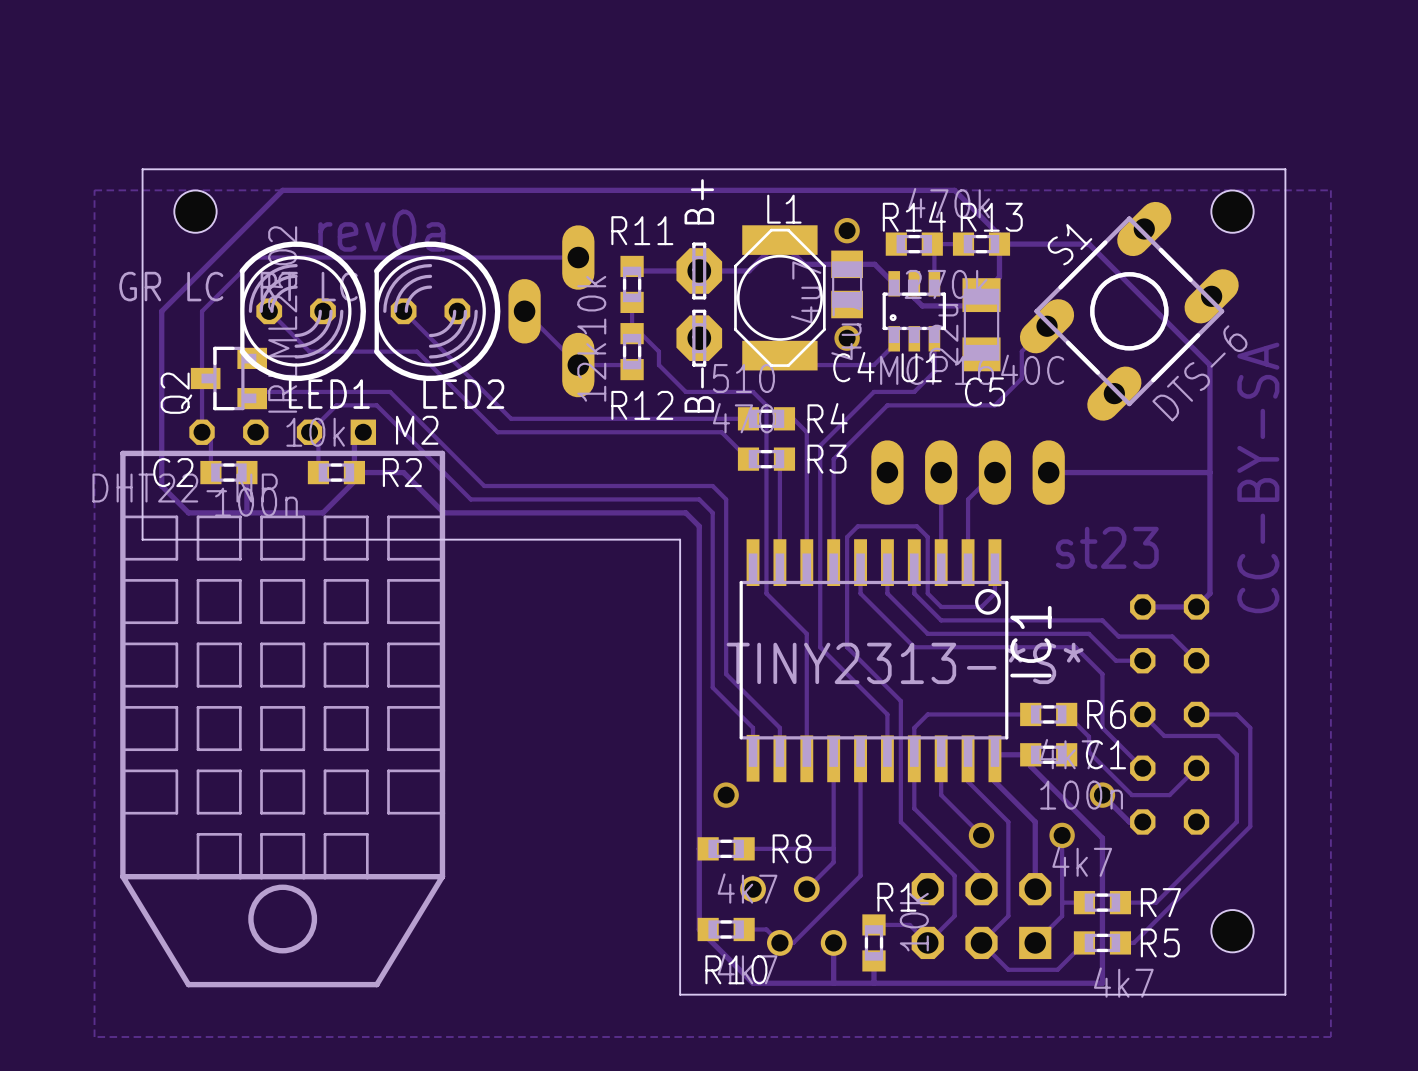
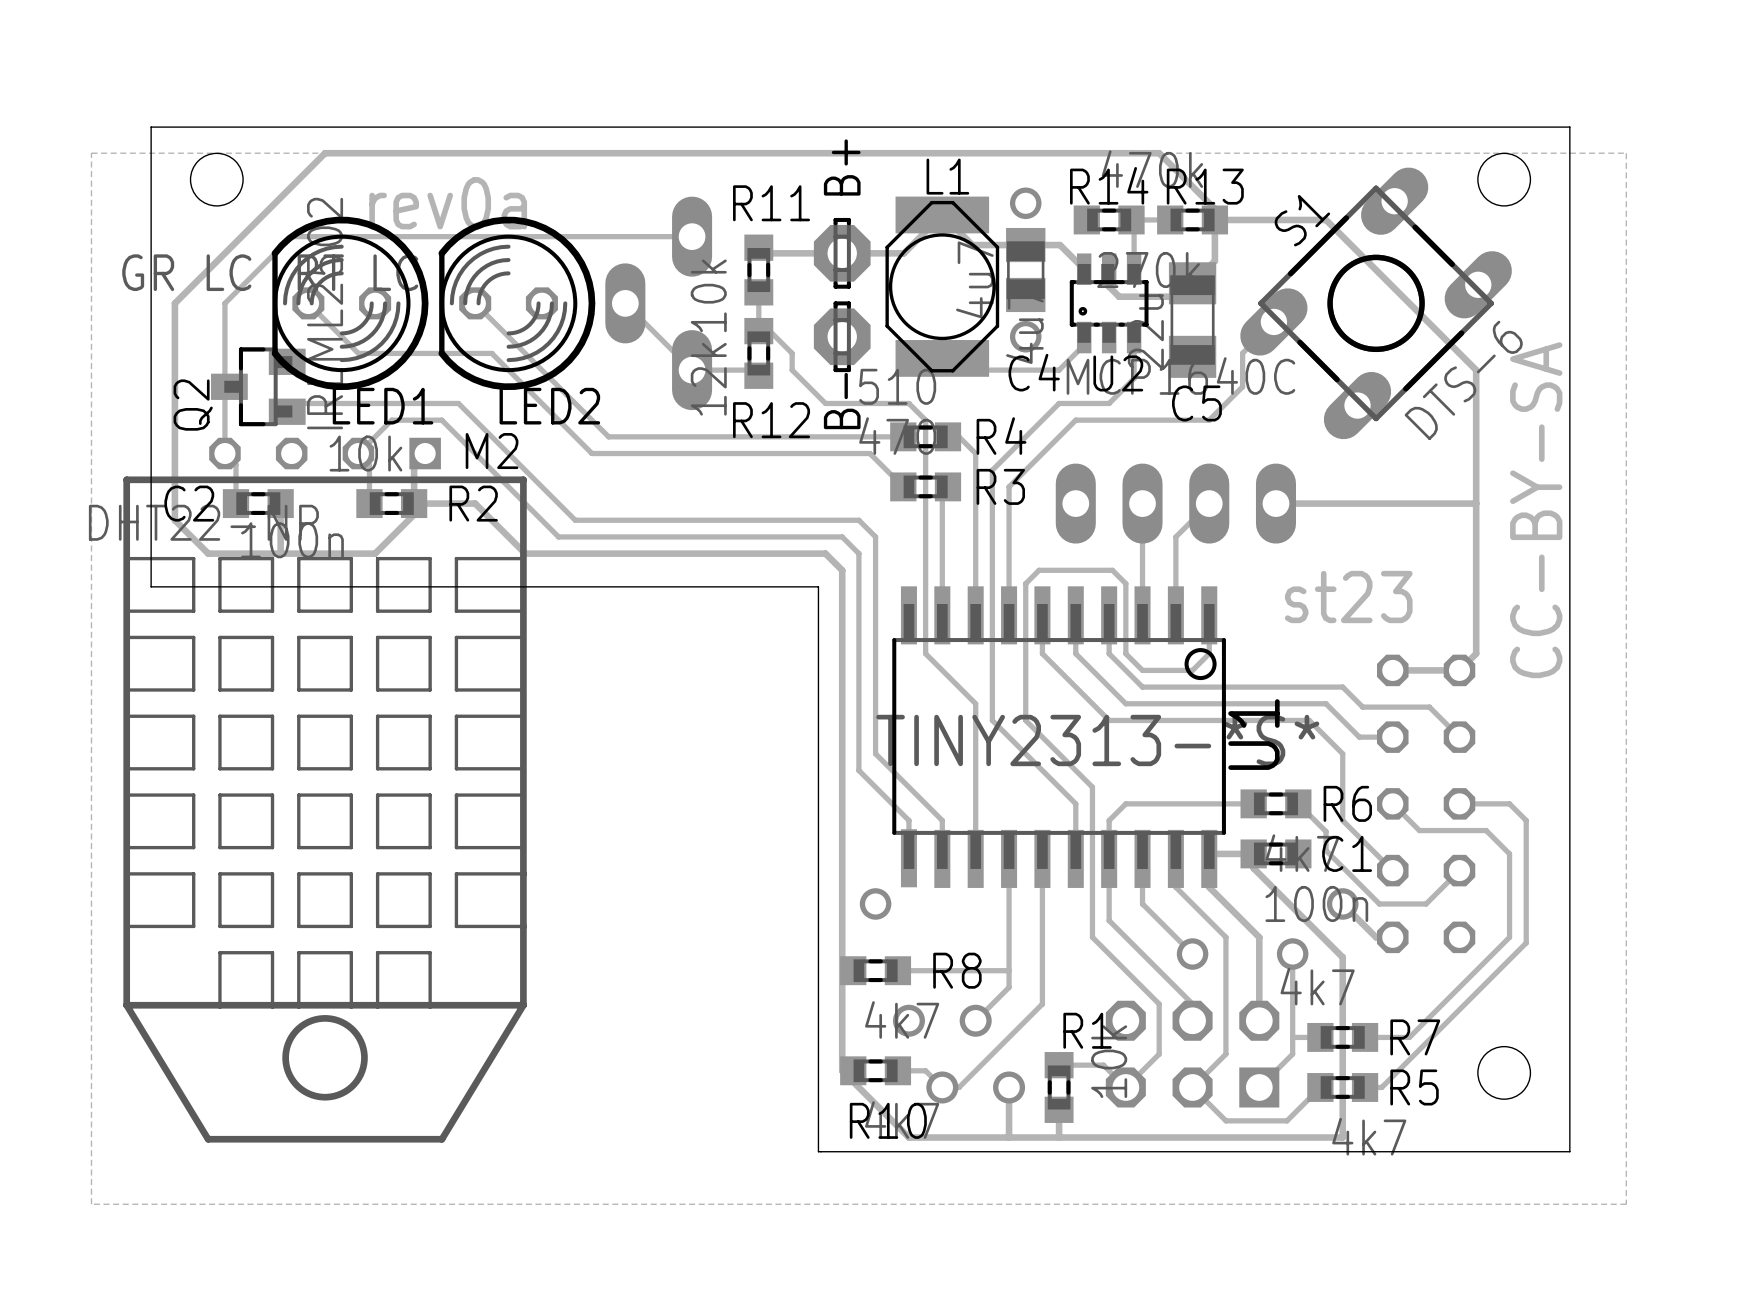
U1 name: U1 (921, 367) -> U2 (1118, 373)
IC1 name: IC1 (1030, 641) -> U1 (1253, 734)

